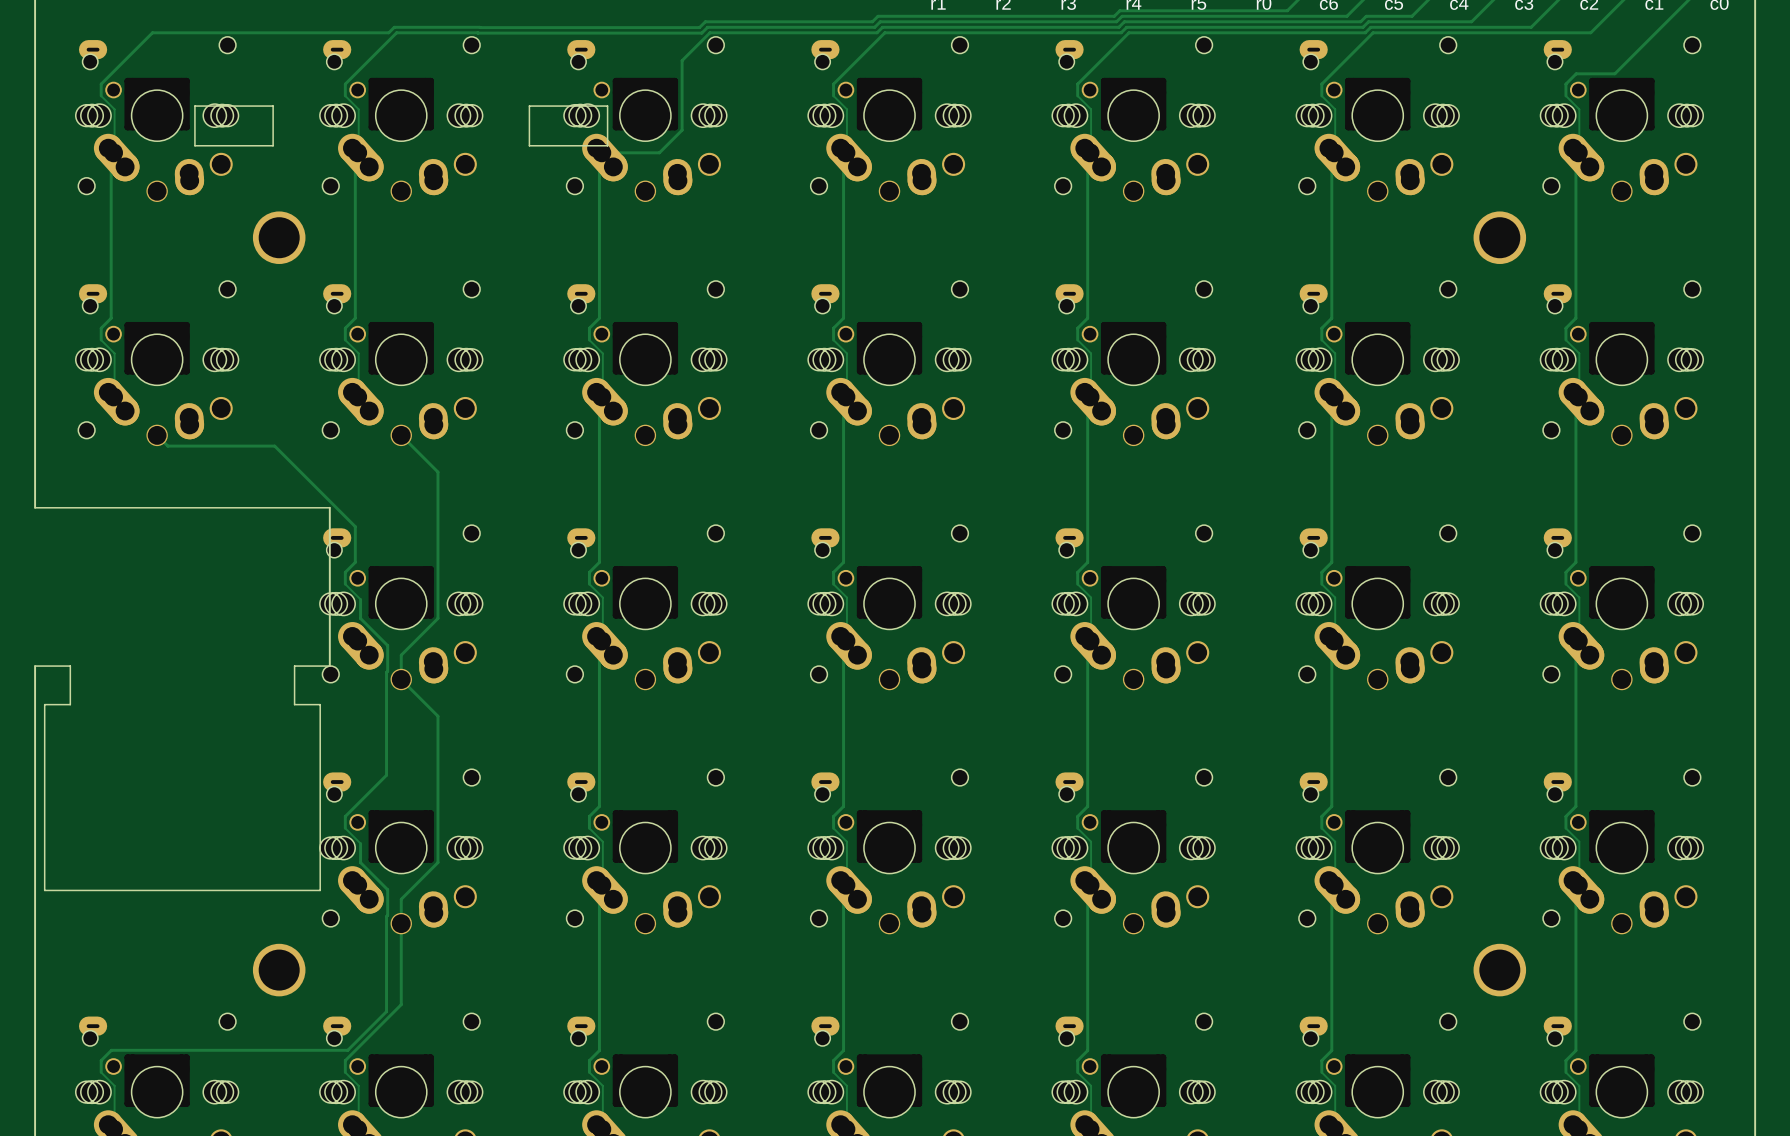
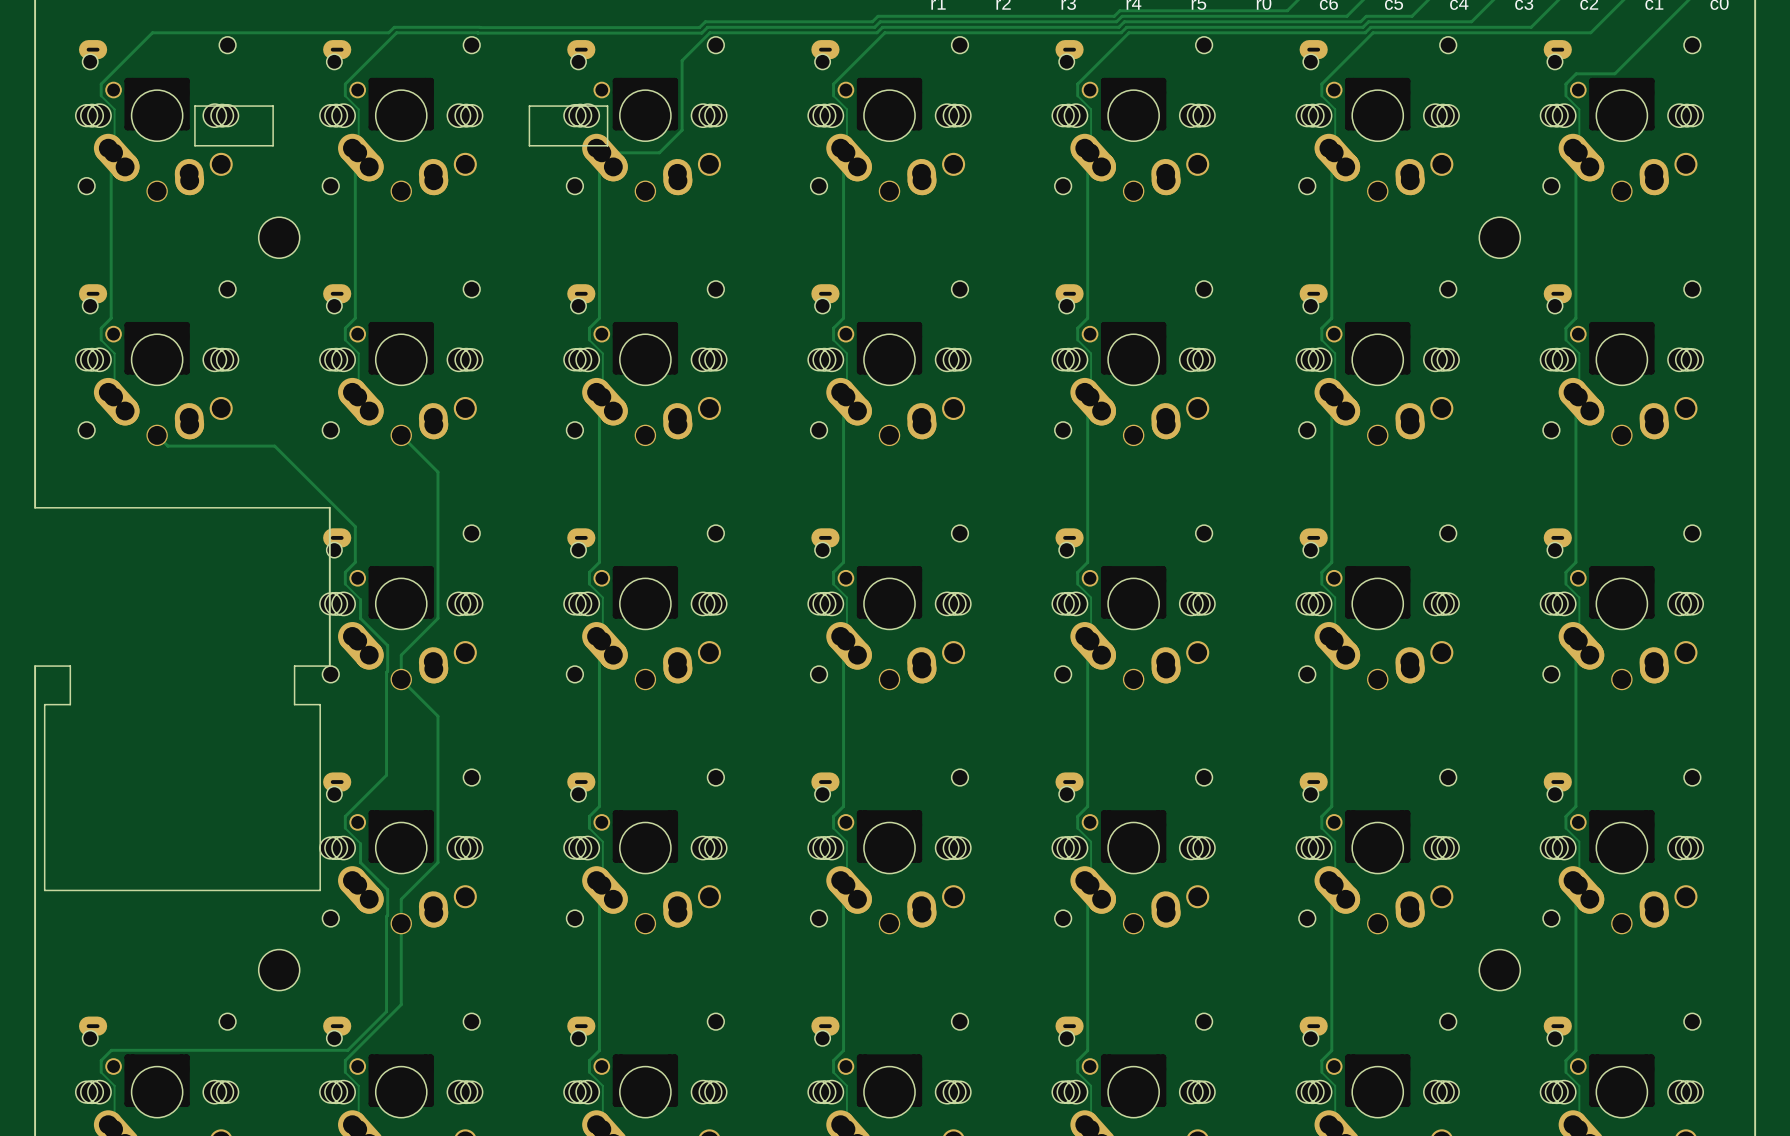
part footprint: [252, 211, 306, 264] -> [258, 217, 300, 259]
part footprint: [1473, 211, 1527, 264] -> [1479, 217, 1521, 259]
part footprint: [252, 943, 306, 997] -> [258, 949, 300, 991]
part footprint: [1473, 943, 1527, 997] -> [1479, 949, 1521, 991]

